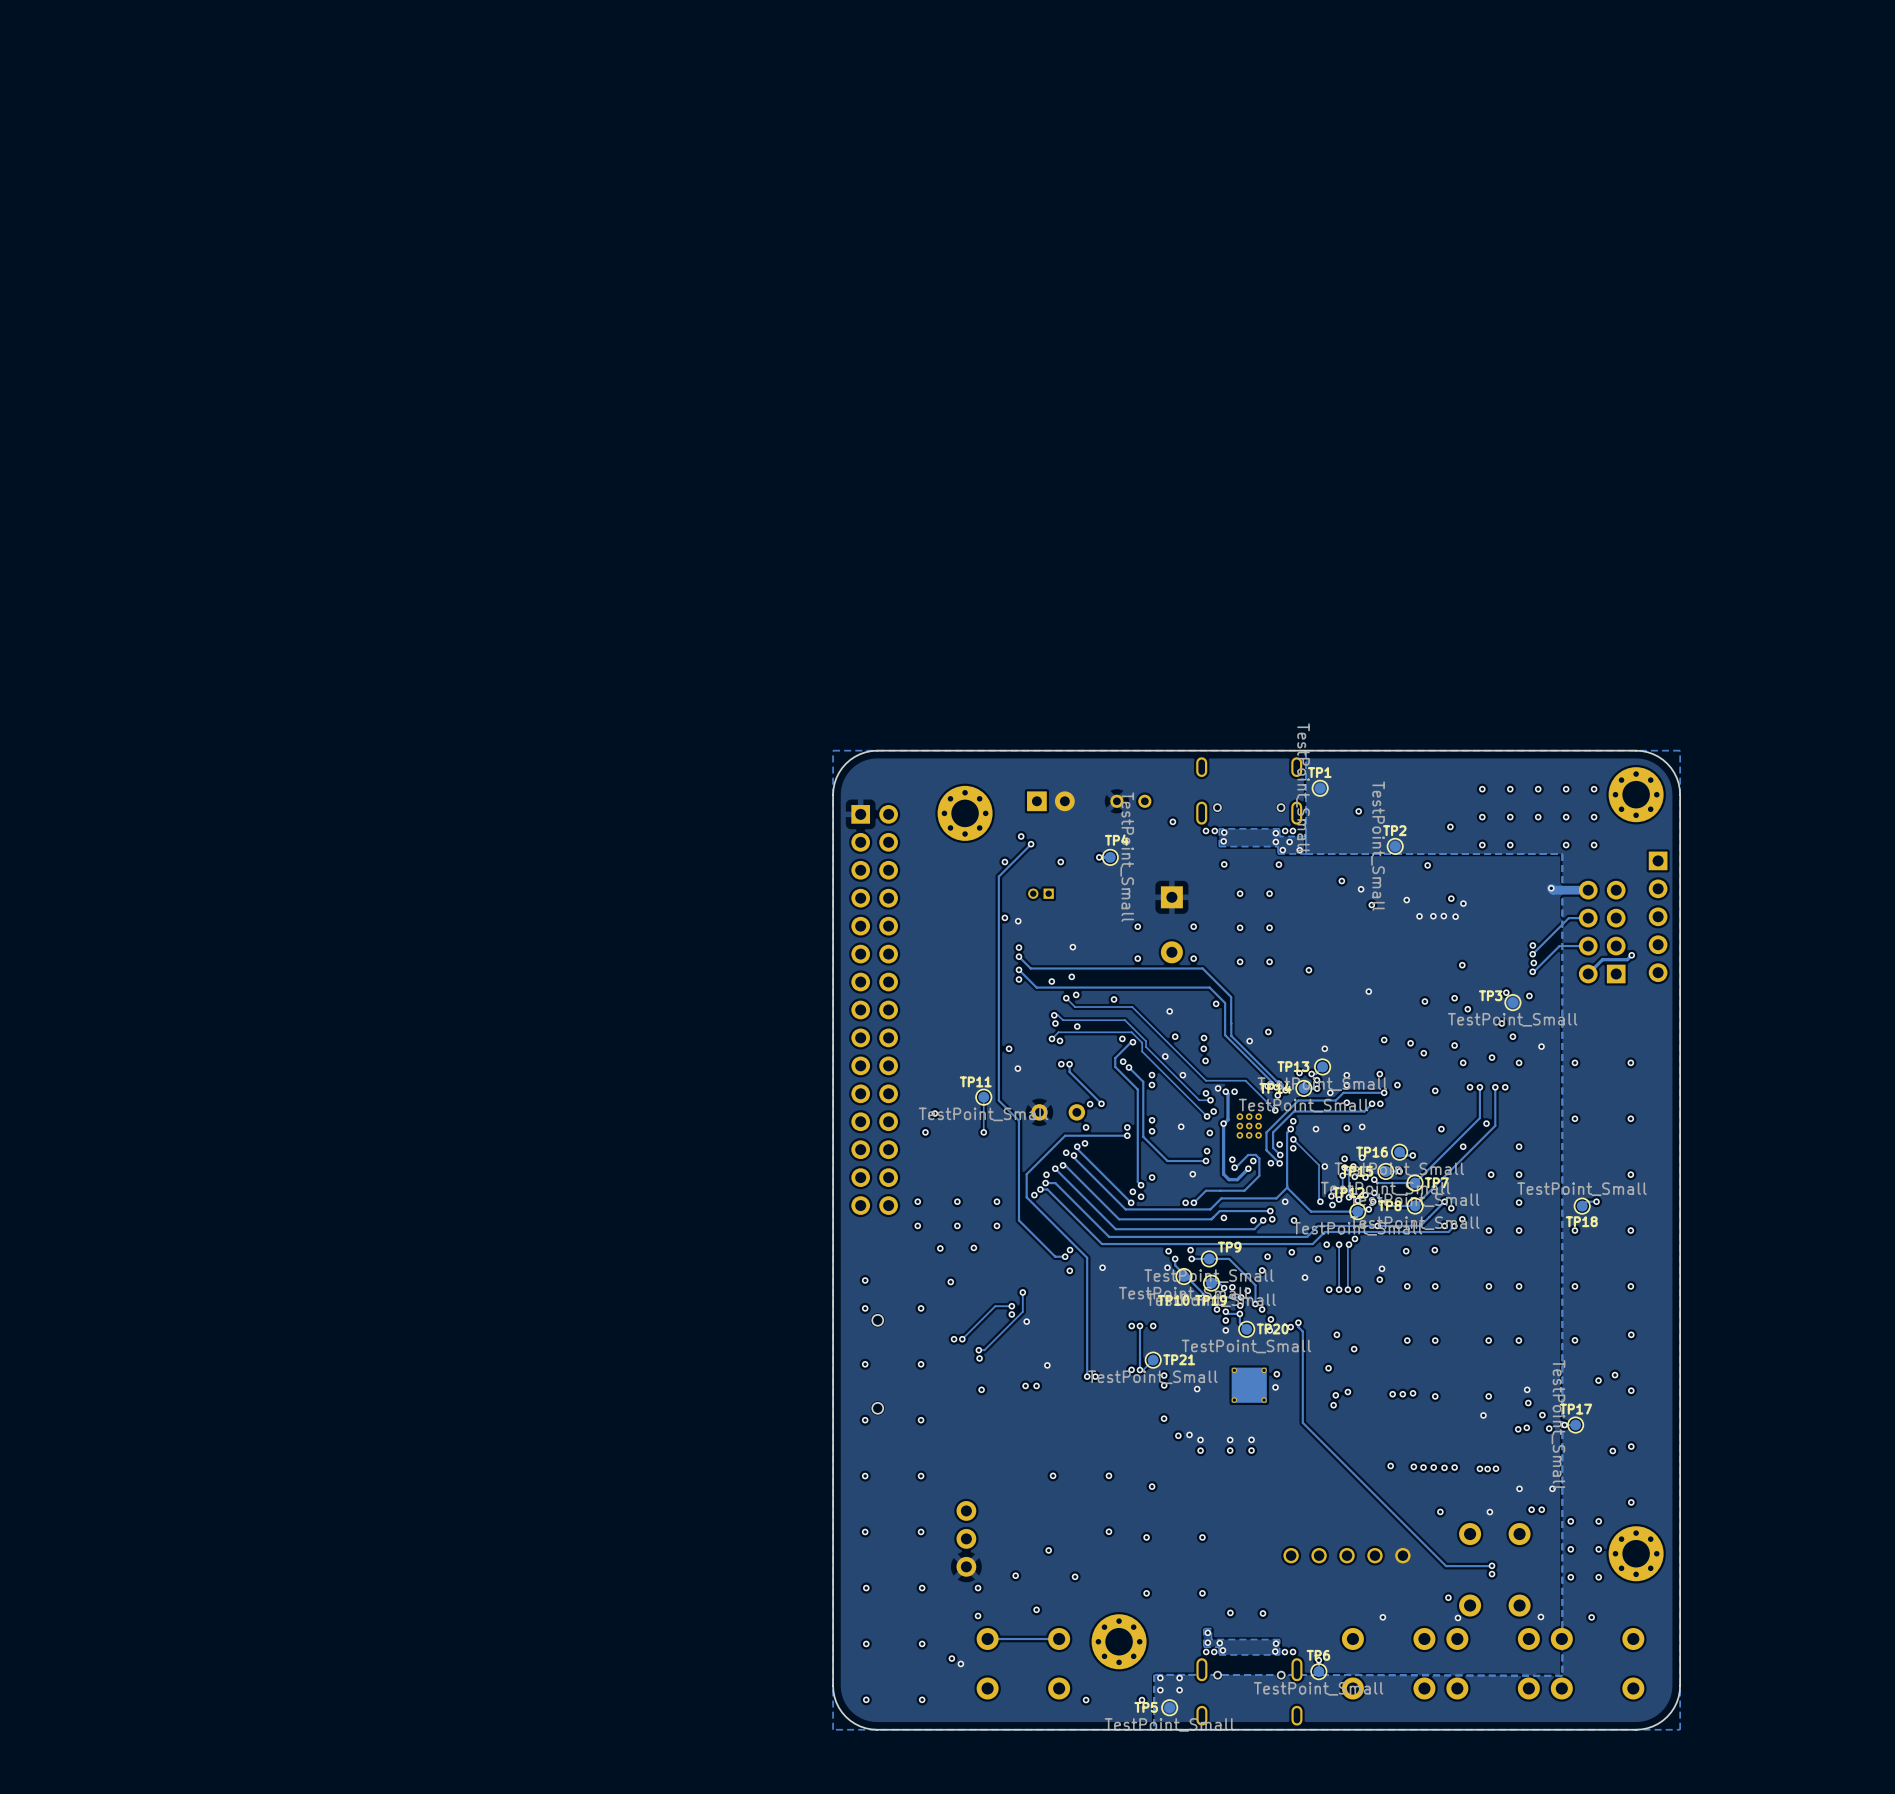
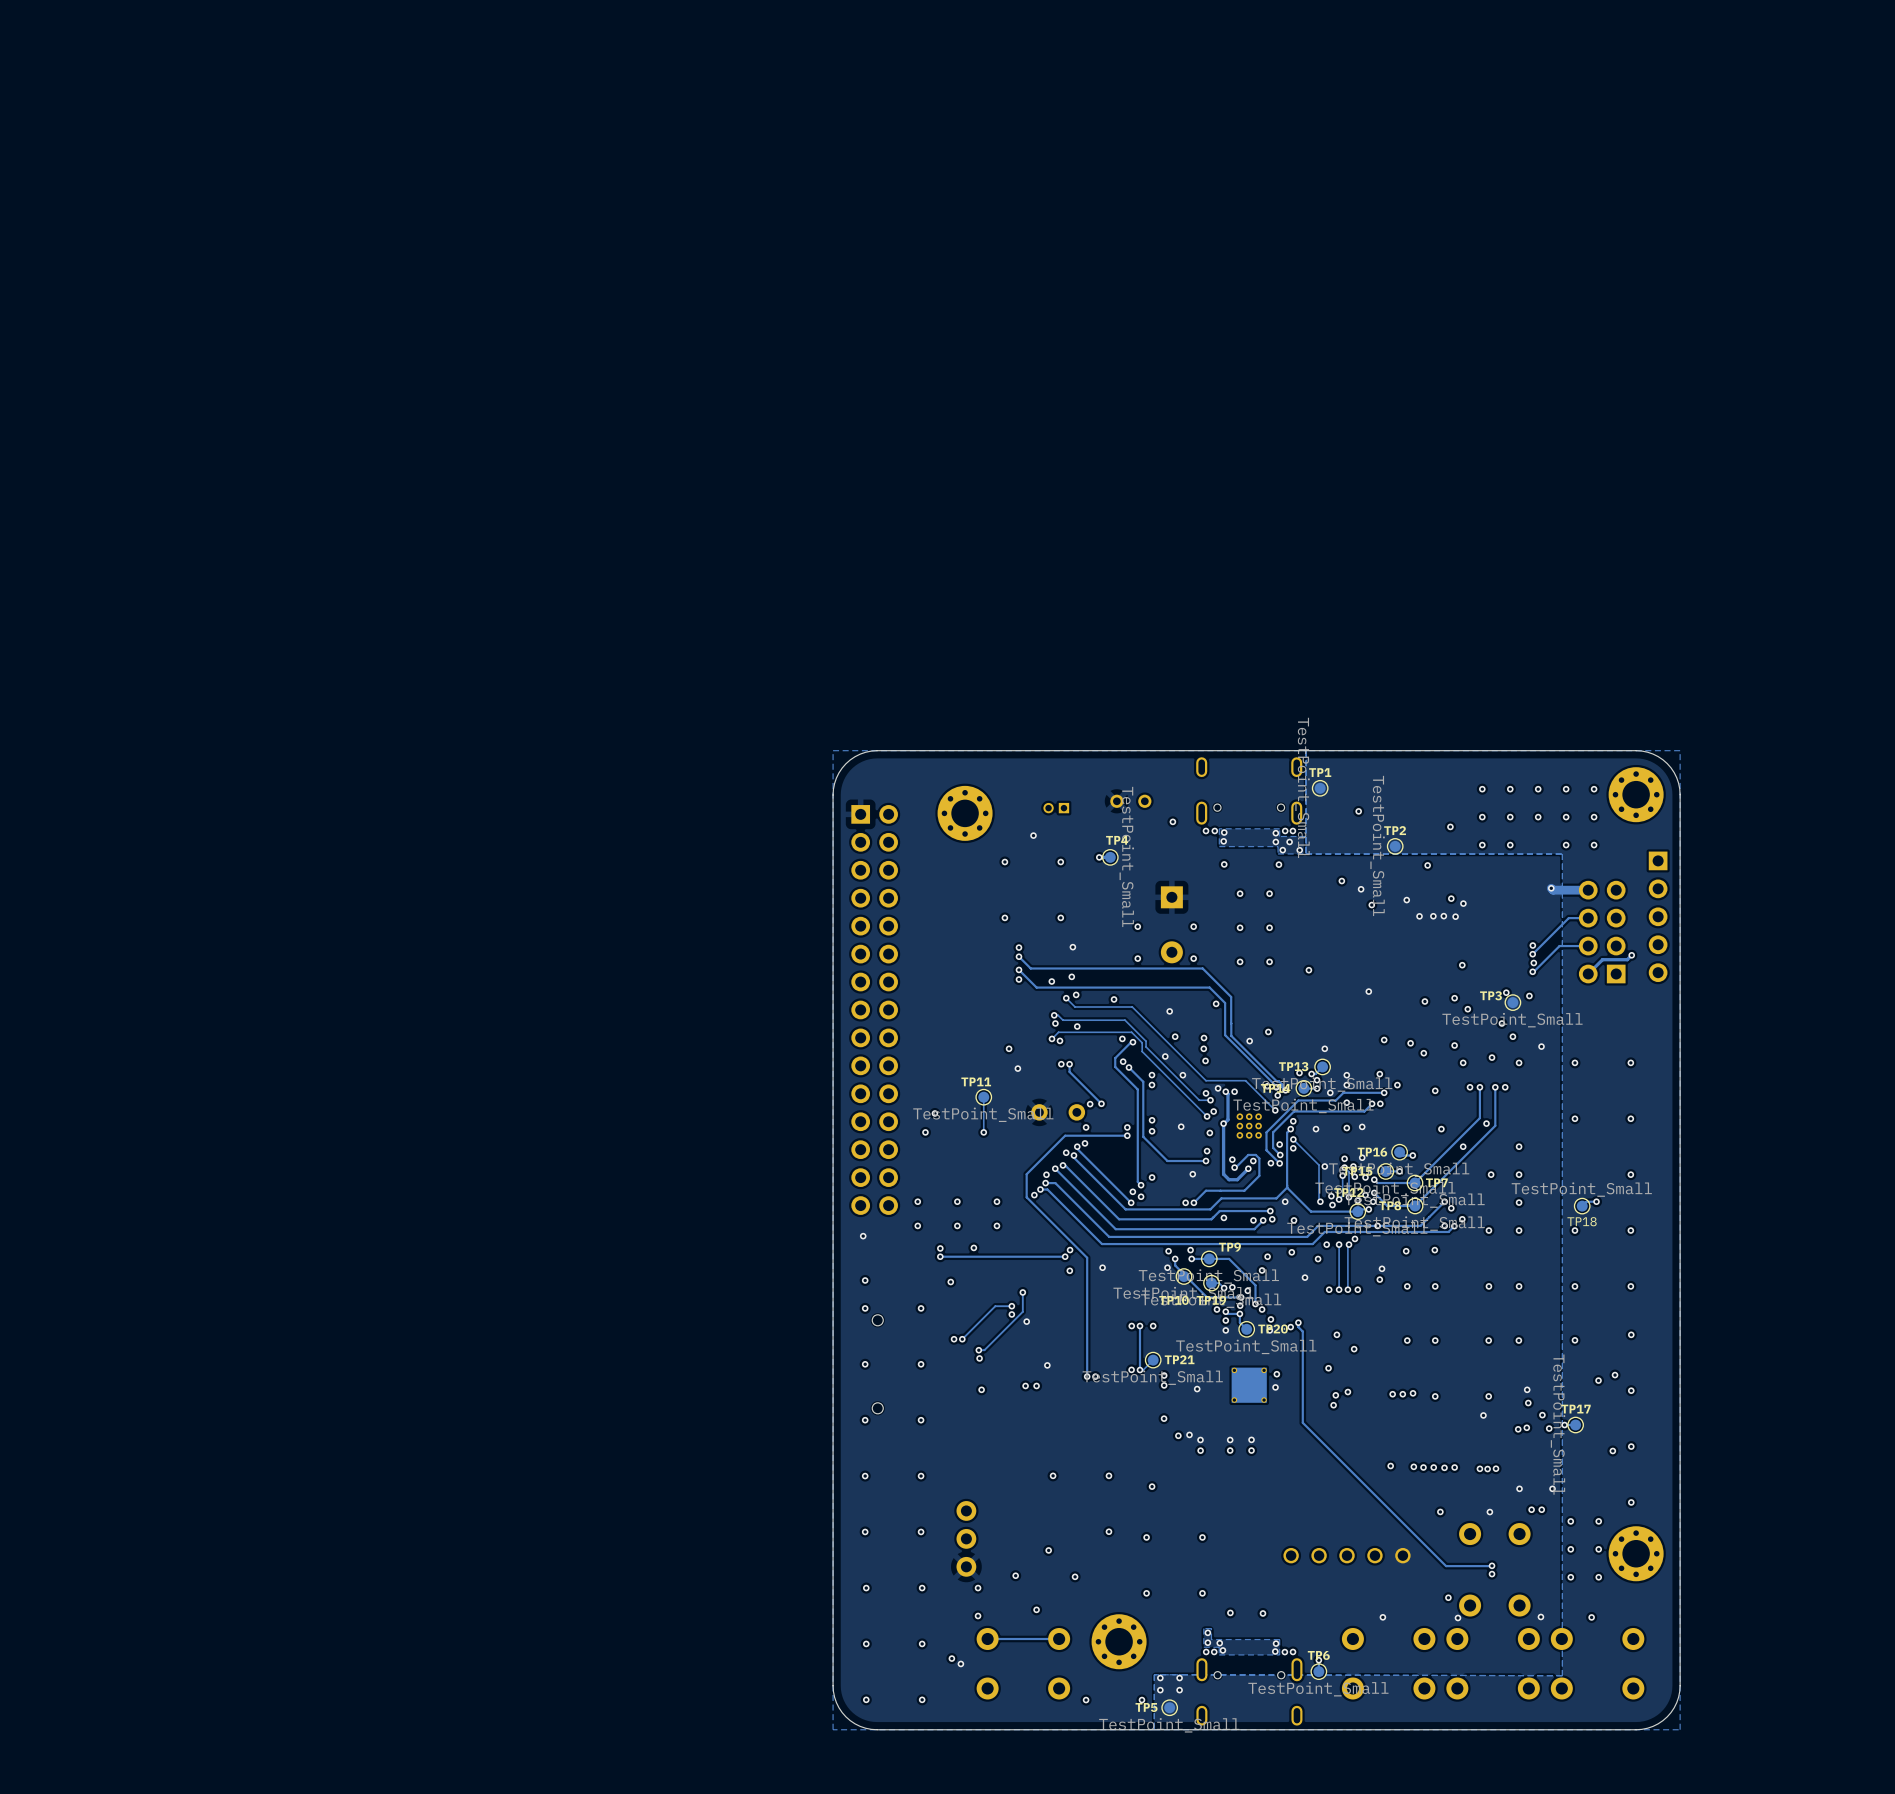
part footprint: [1027, 791, 1075, 812] -> [1043, 802, 1070, 814]
via: none -> (1033, 835)
via: (1021, 836) -> none
track: (1031, 844) (998, 876) (998, 1100) (1018, 1120) (1018, 1220) (1055, 1256) -> (940, 1256) (1055, 1256)
via: (1031, 844) -> none
part: (1040, 893) -> none
via: none -> (1060, 917)
via: (1018, 921) -> none
via: none -> (863, 1236)
via: none -> (940, 1256)

